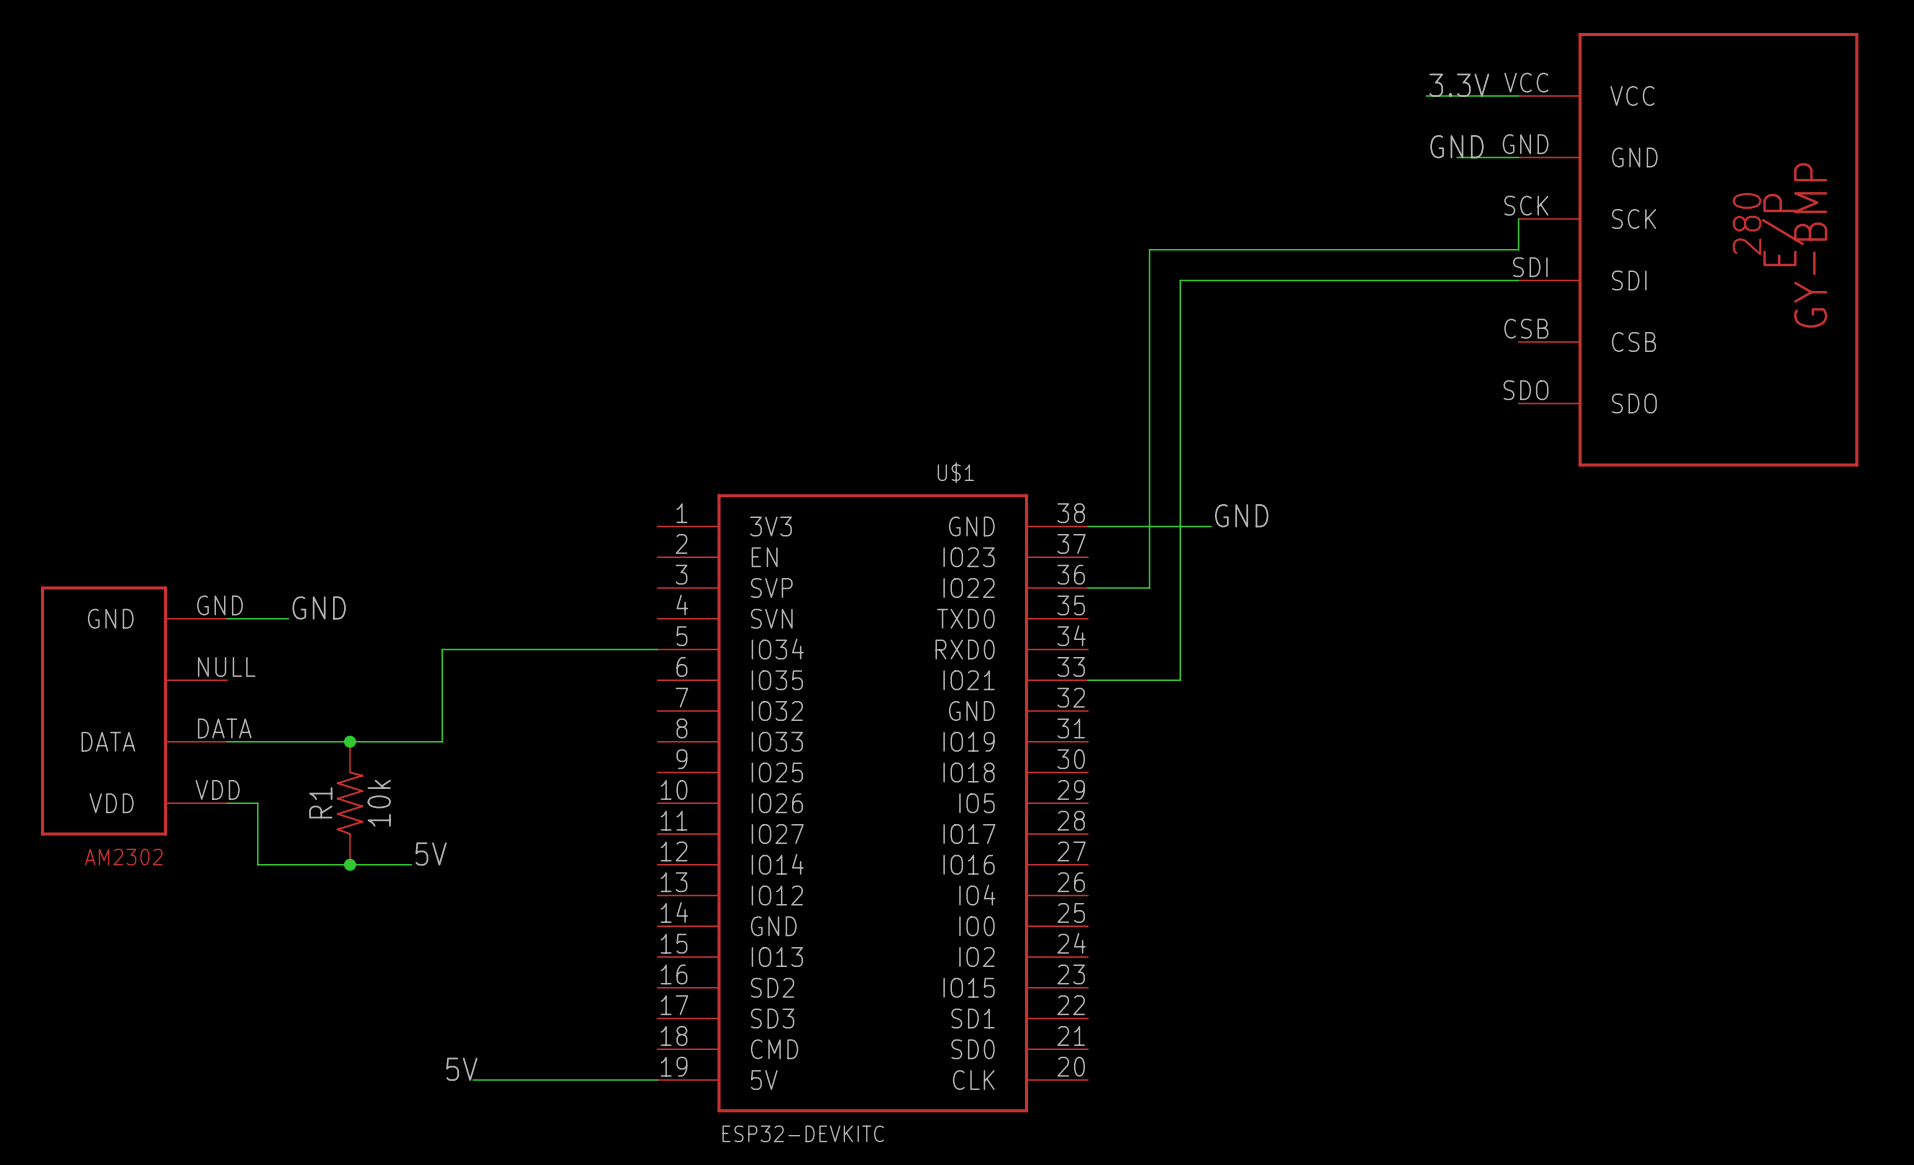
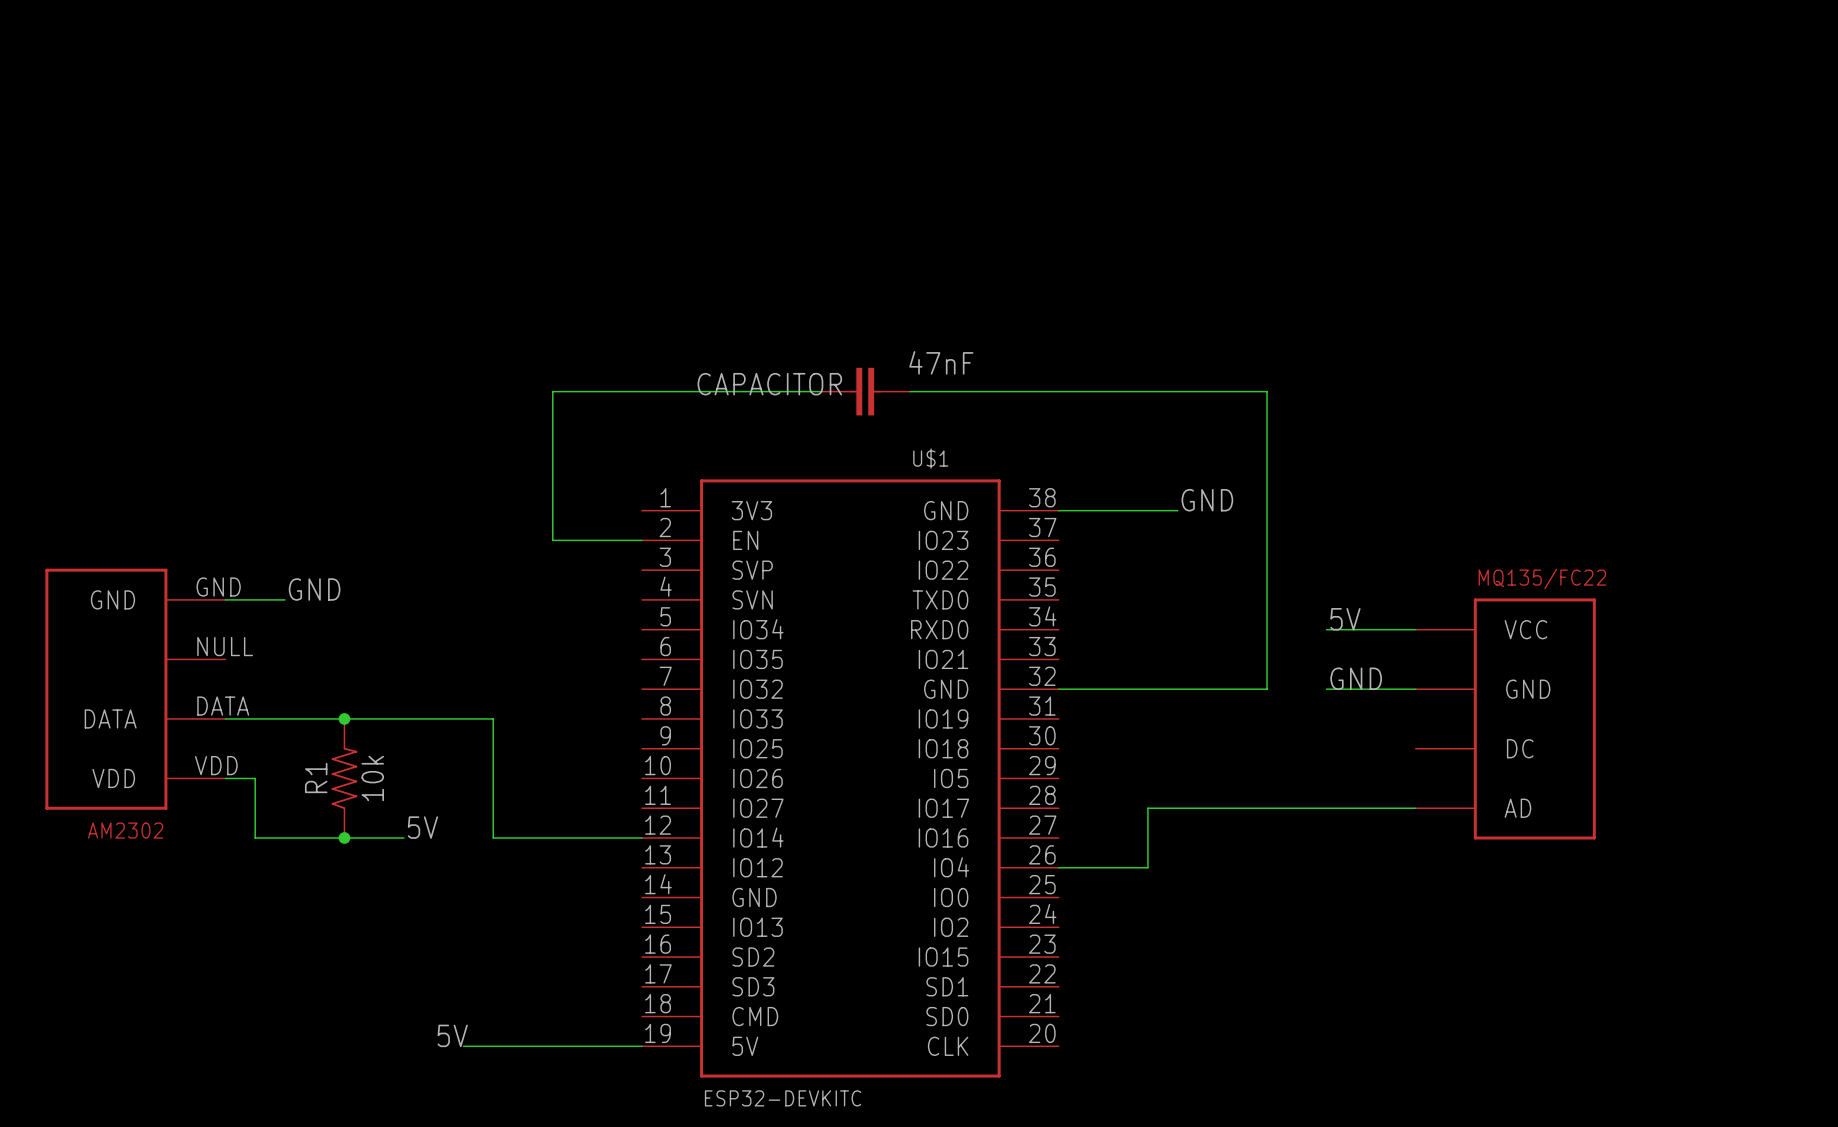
label: 3.3V (1459, 85) -> none
wire: (1426, 95) (1518, 95) -> none
label: GND (1456, 146) -> none
wire: (1457, 157) (1518, 157) -> none
wire: (1518, 218) (1518, 249) (1149, 249) (1149, 588) (1088, 588) -> none
part: (1688, 249) -> none
wire: (1518, 280) (1180, 280) (1180, 680) (1088, 680) -> none
wire: none -> (820, 391) (552, 391) (552, 540) (642, 540)
CAPACITOR: none -> 47nF (865, 391)
wire: none -> (909, 391) (1266, 391) (1266, 689) (1058, 689)
label: none -> 5V (1345, 619)
wire: (657, 649) (442, 649) (442, 741) -> (642, 837) (493, 837) (493, 718) (433, 718)
wire: none -> (1326, 629) (1415, 629)
label: none -> GND (1356, 678)
wire: none -> (1326, 689) (1415, 689)
MQ135/FC22: none -> (1505, 718)
wire: none -> (1415, 808) (1147, 808) (1147, 867) (1058, 867)

